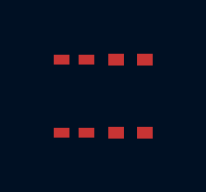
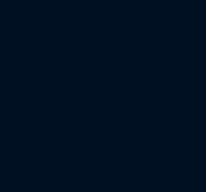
part: (74, 59) -> none
part: (130, 59) -> none
part: (74, 132) -> none
part: (130, 132) -> none

